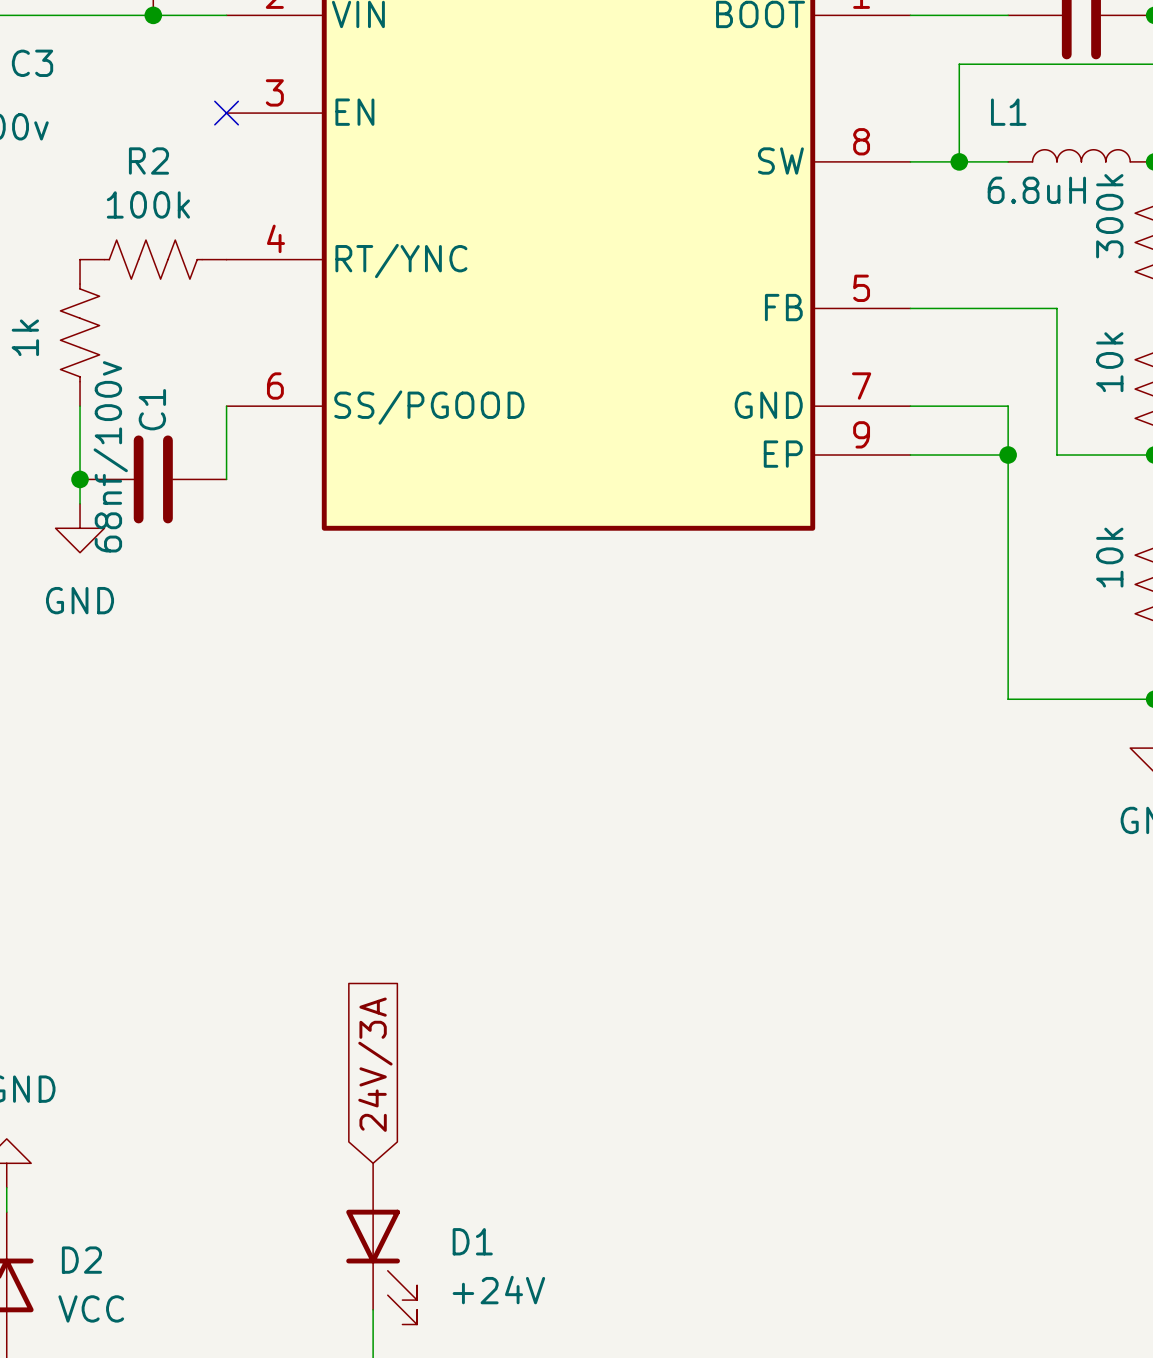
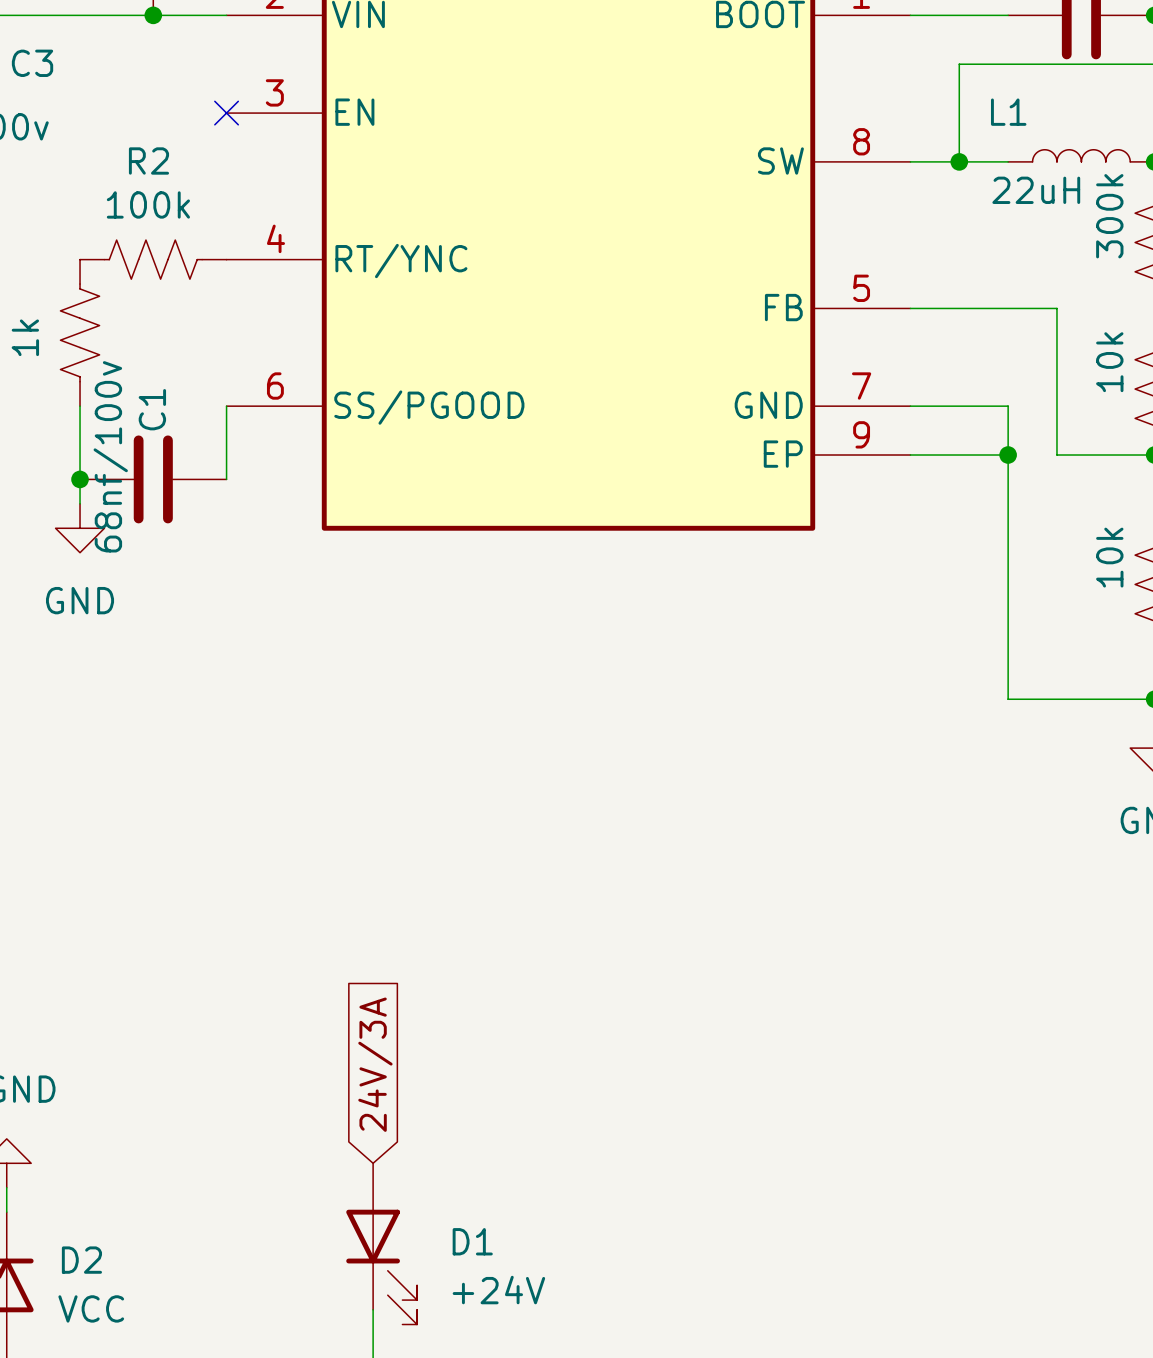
L1 value: 6.8uH (1036, 190) -> 22uH (1036, 190)

